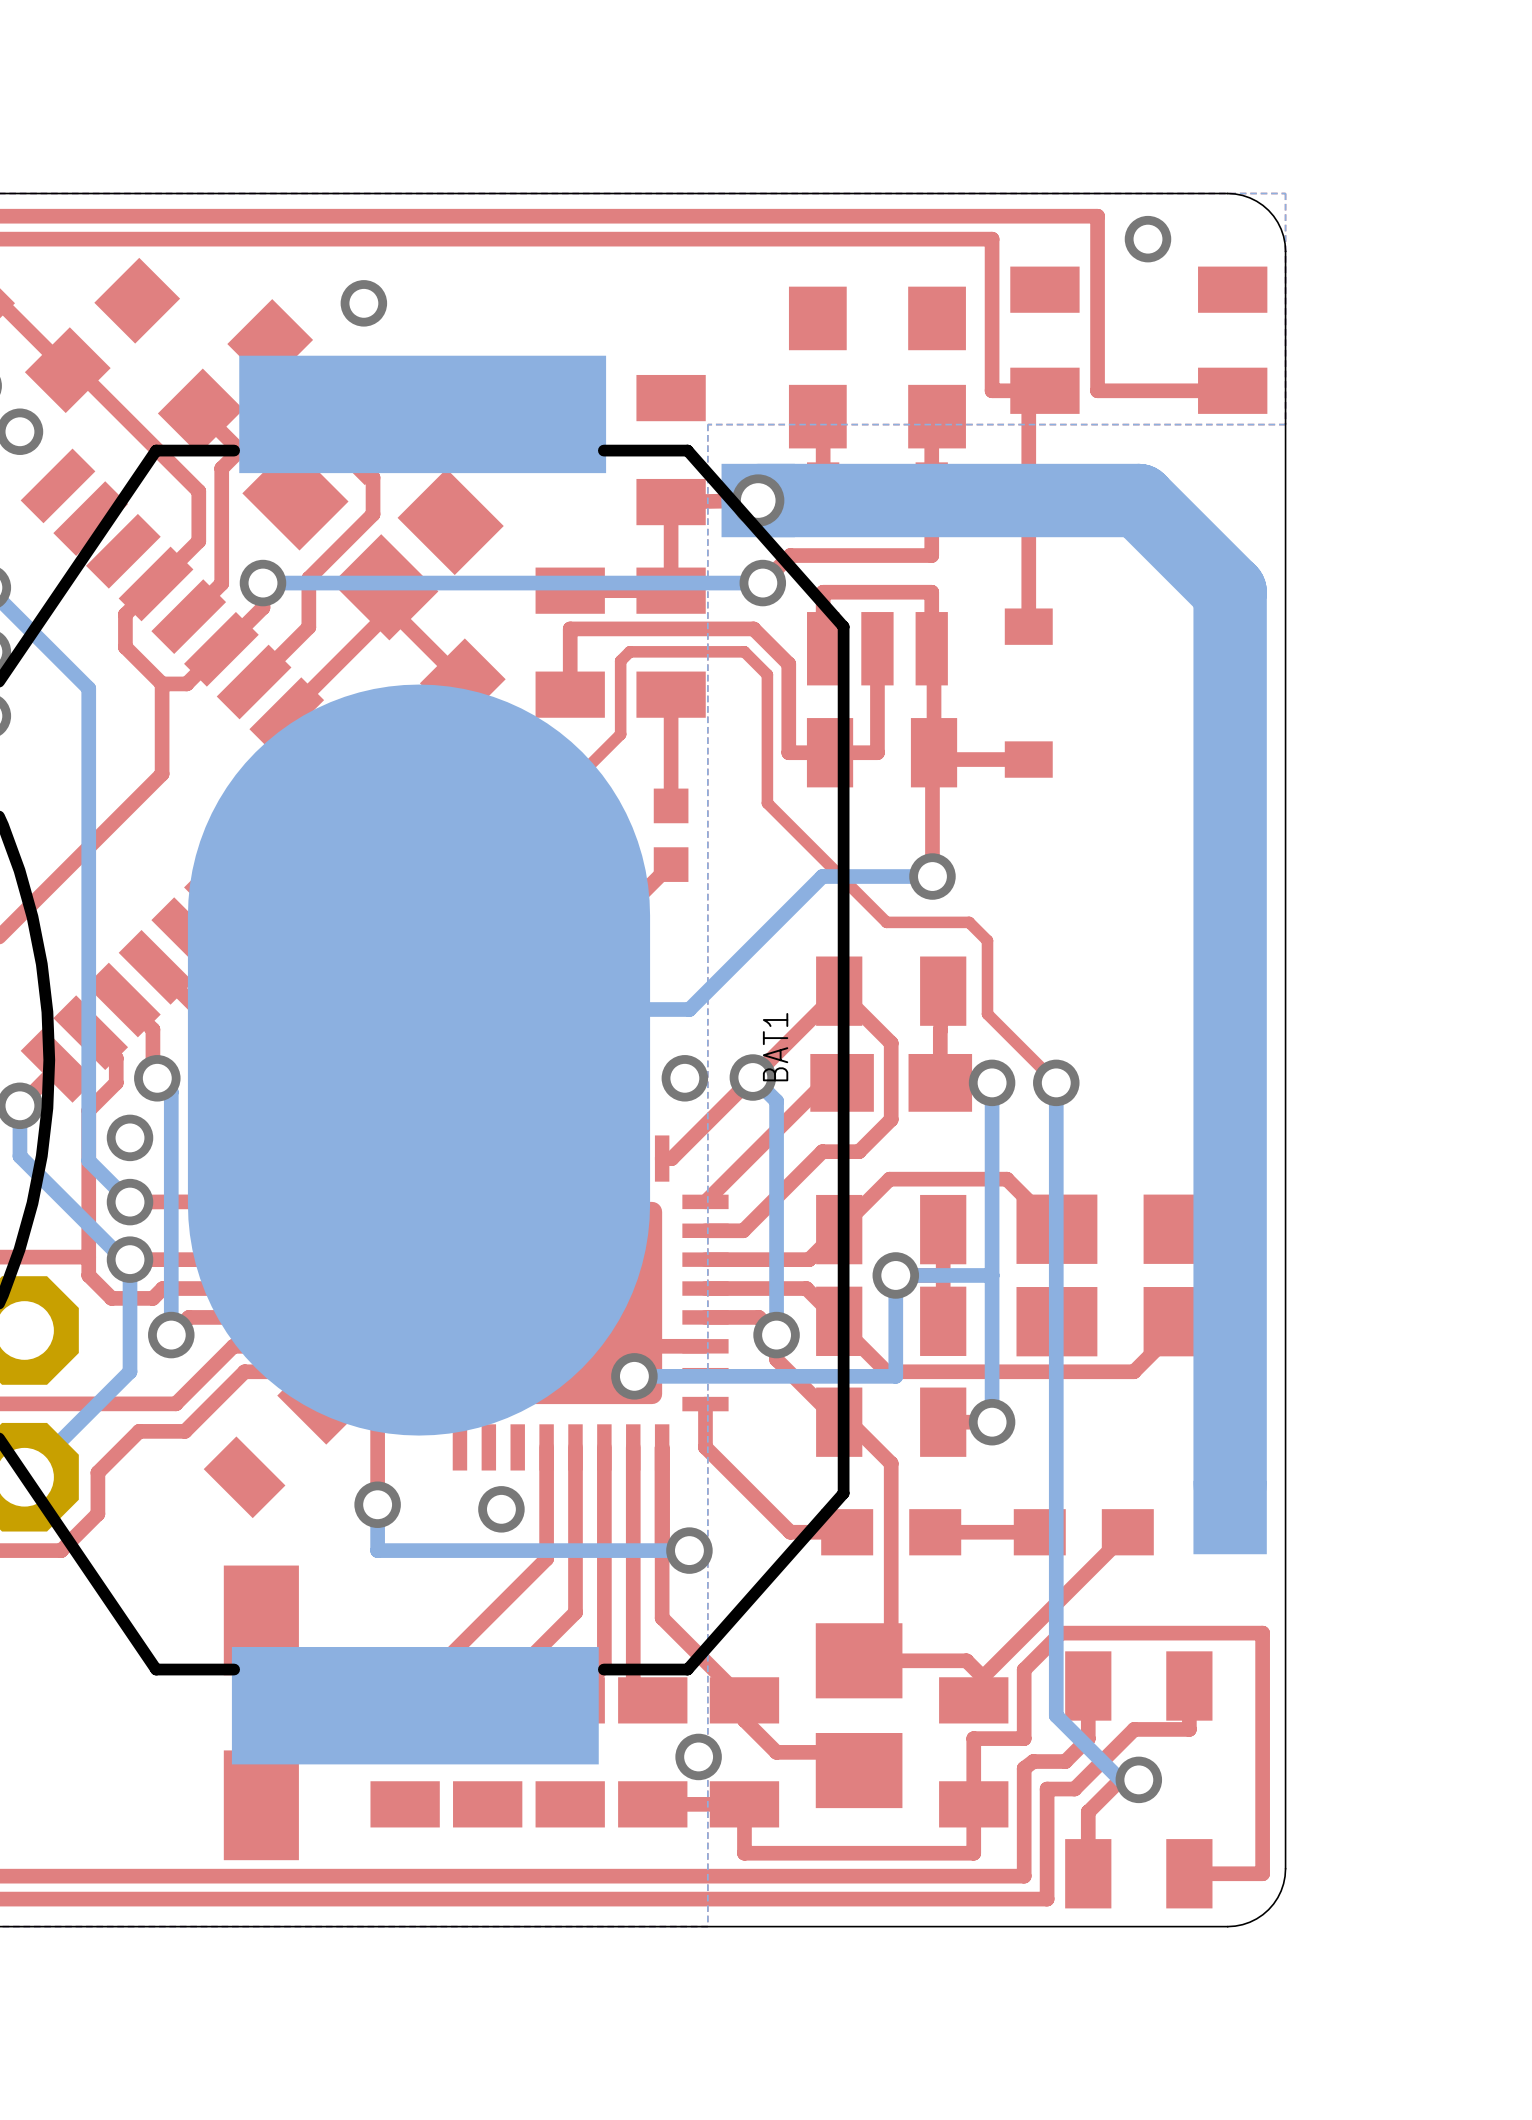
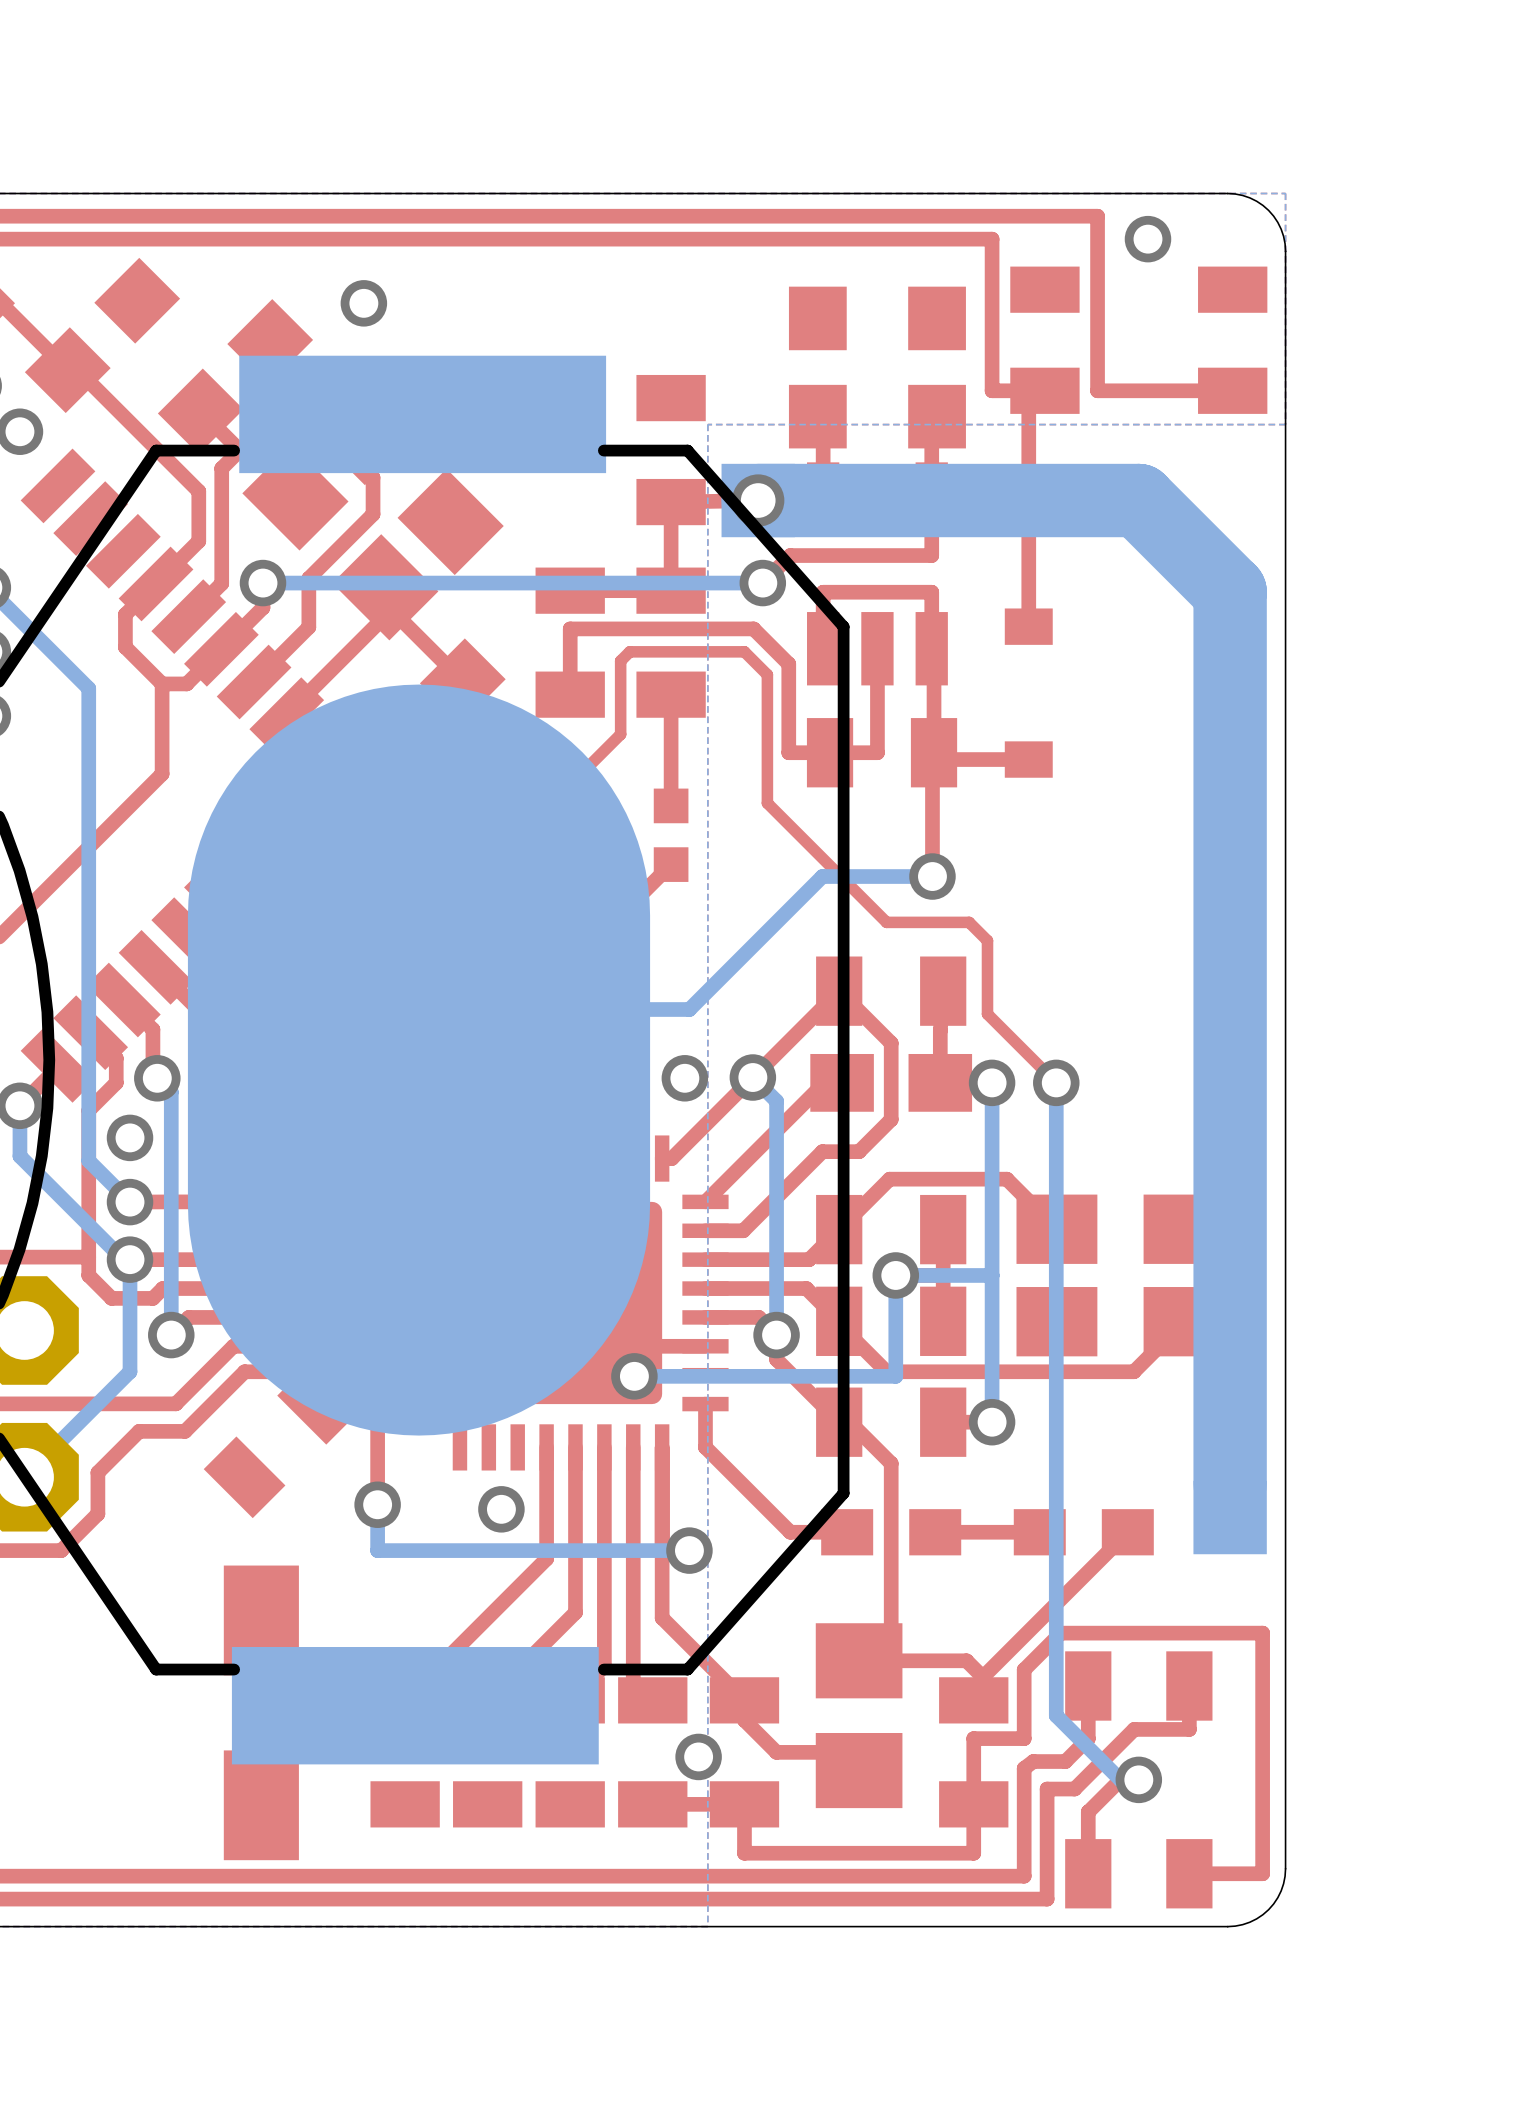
BAT1 name: BAT1 (775, 1047) -> none

